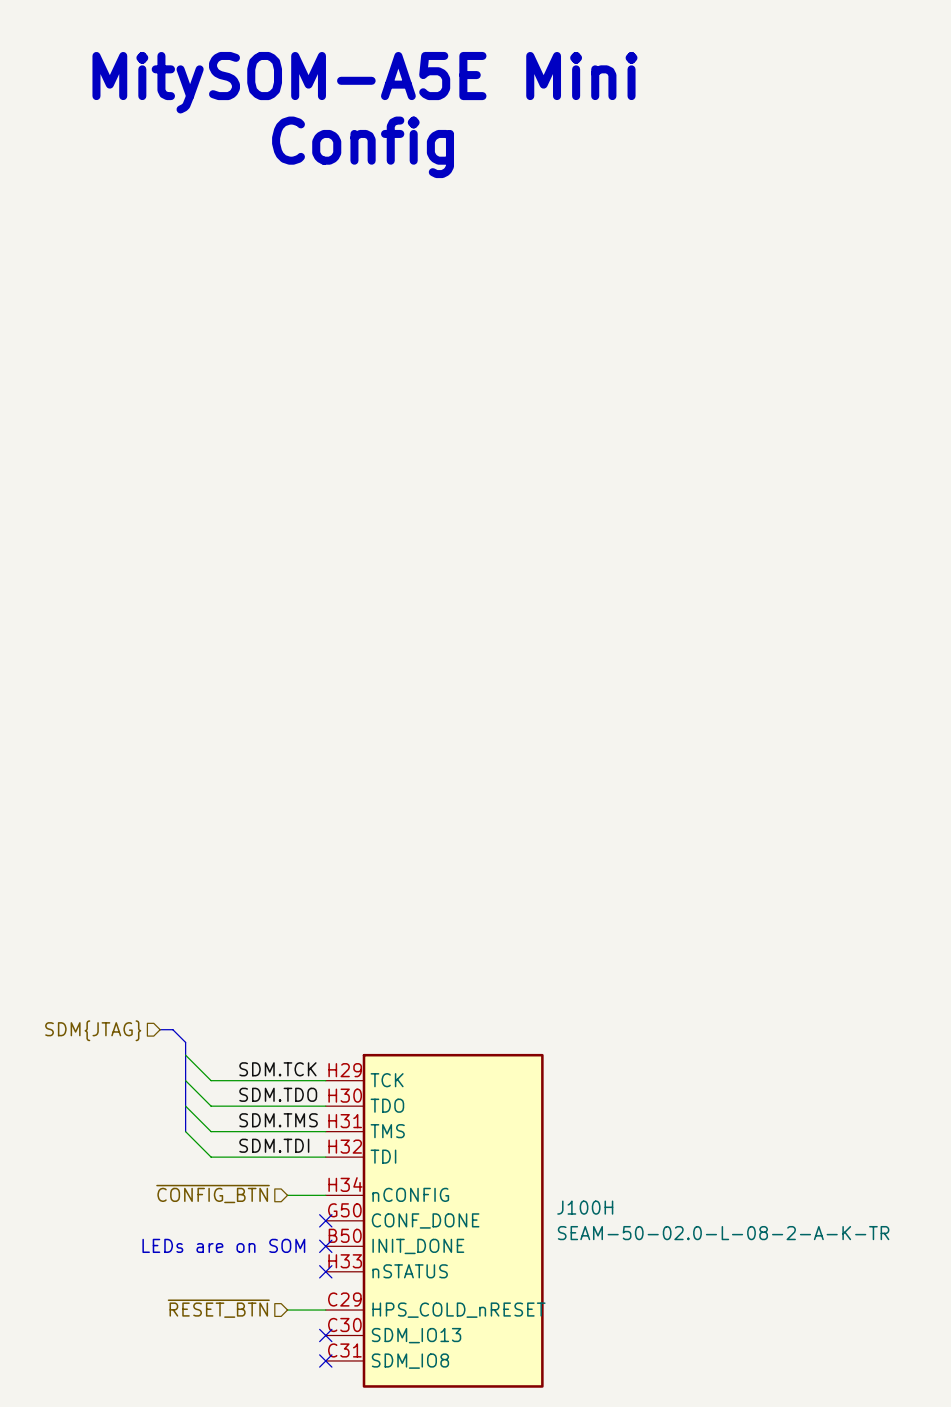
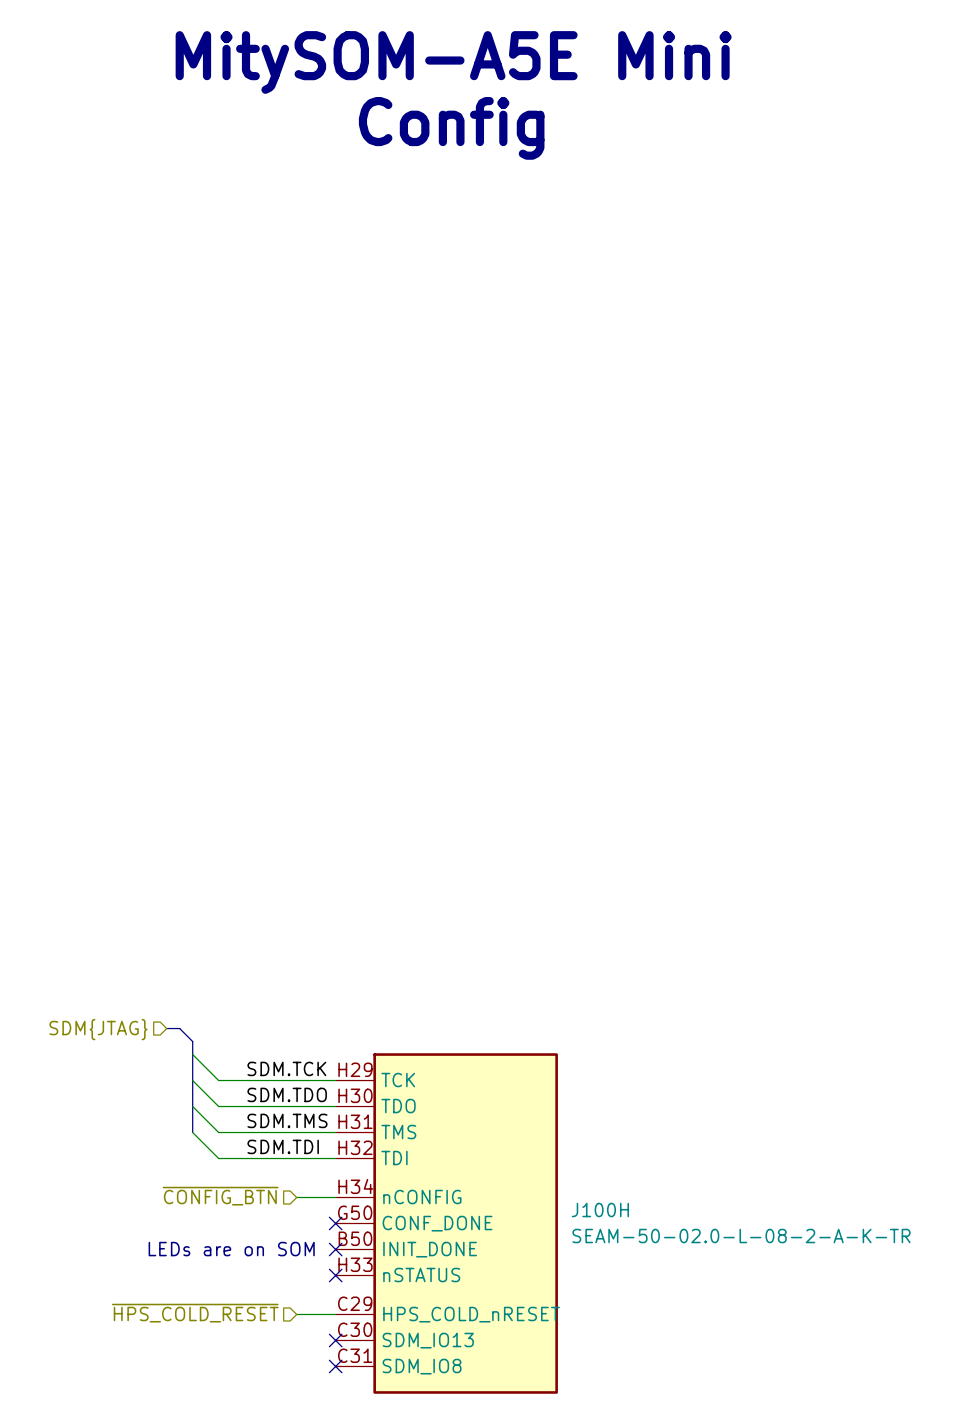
text position: MitySOM-A5E Mini (364, 82) -> MitySOM-A5E Mini (453, 62)
text position: Config (363, 147) -> Config (451, 128)
hierarchical label: ~{RESET_BTN} (218, 1308) -> ~{HPS_COLD_RESET} (195, 1313)

